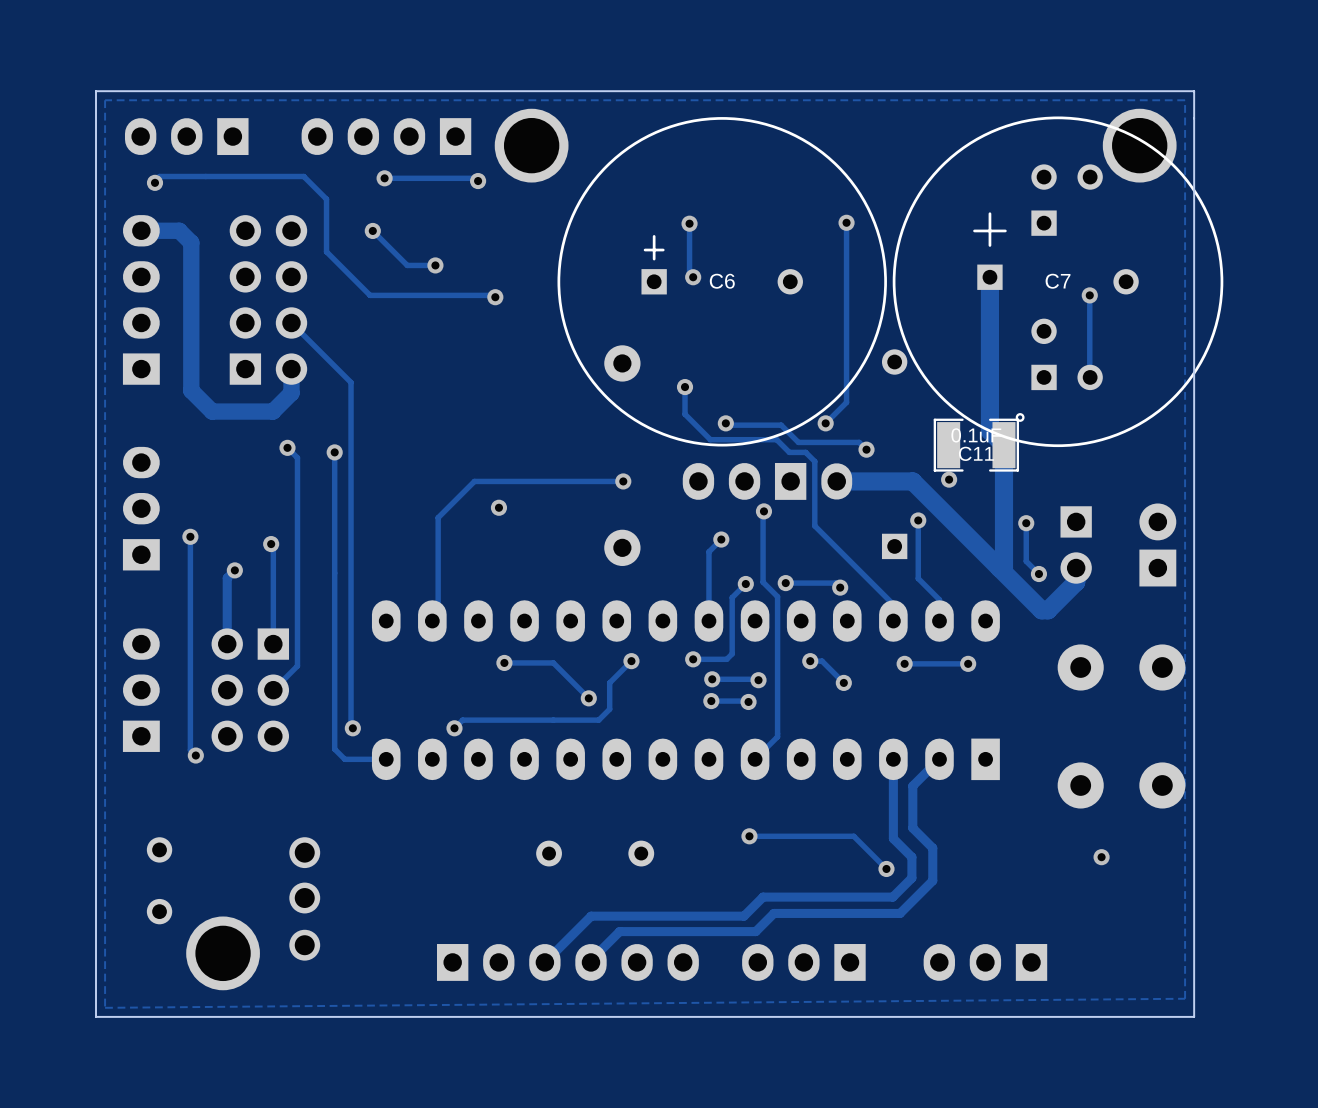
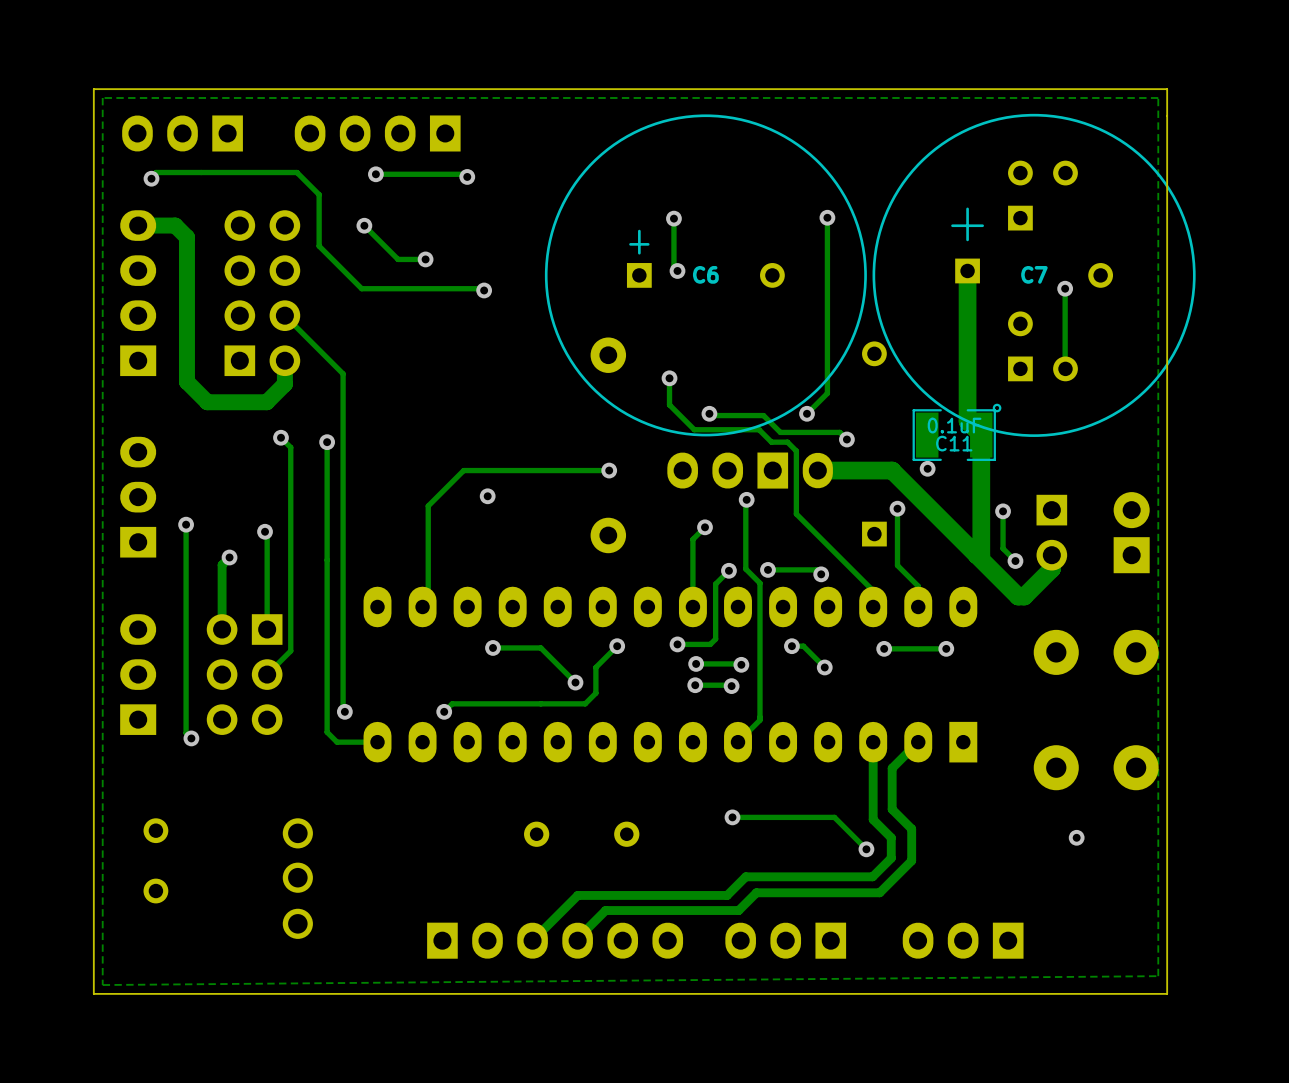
part: (531, 145) -> none
part: (1139, 145) -> none
part: (223, 953) -> none

